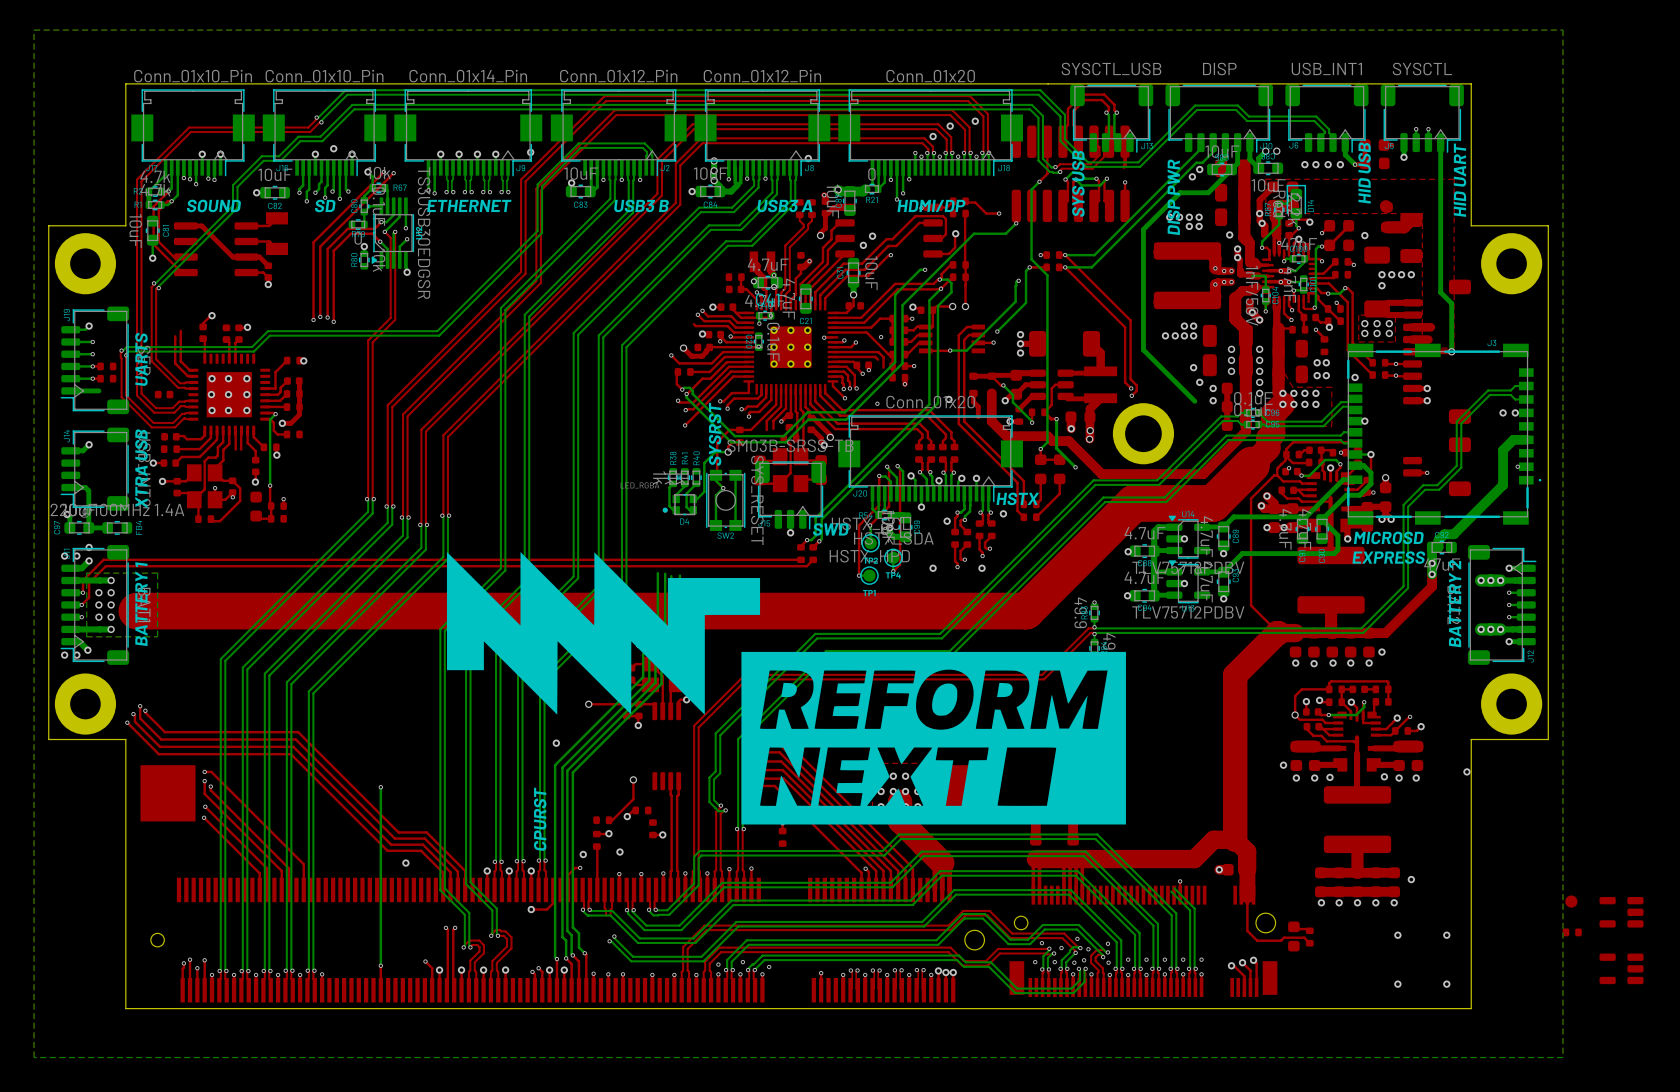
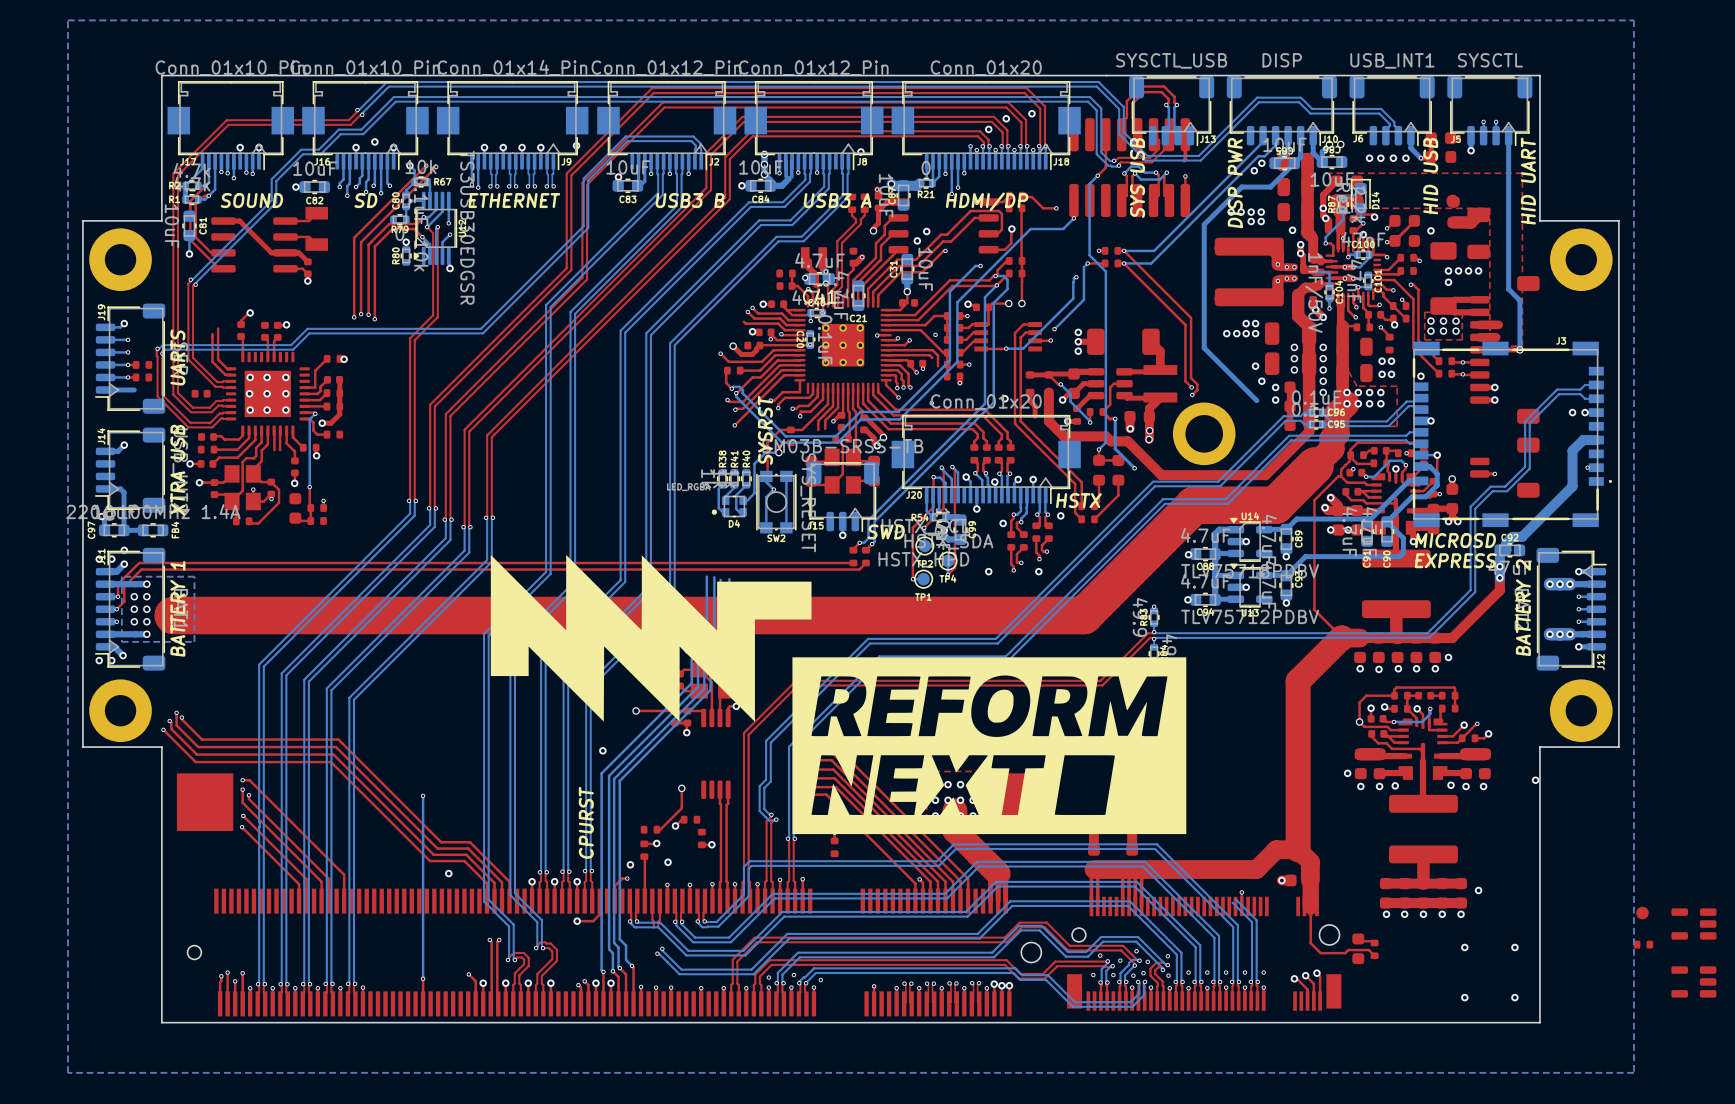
bottom track: (1322, 246) (1315, 249) (1314, 307) -> none
bottom track: (1345, 288) (1339, 293) (1328, 293) -> none

